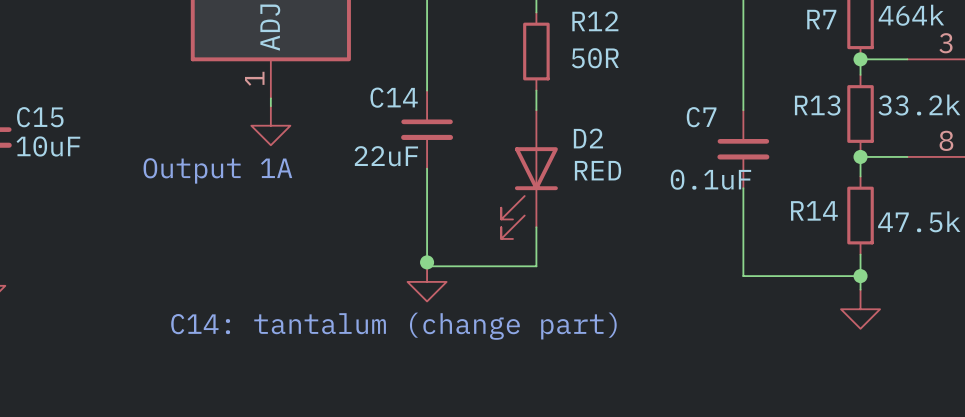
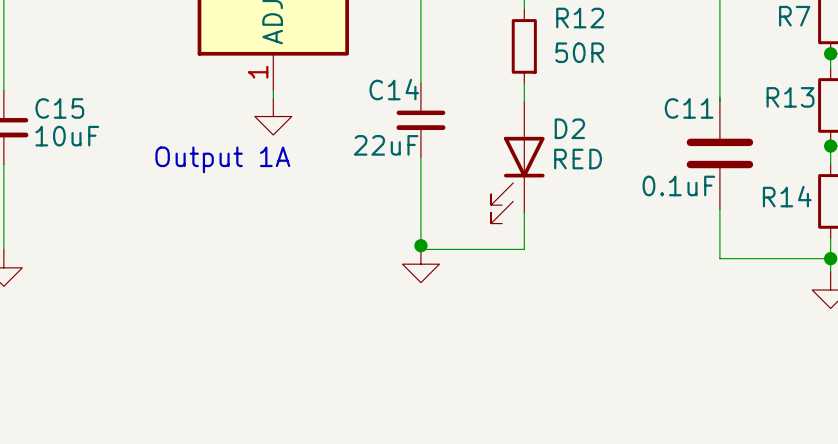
C7: 0.1uF (743, 149) -> none
C11: none -> 0.1uF (719, 153)
text: C14: tantalum (change part) (393, 326) -> none

